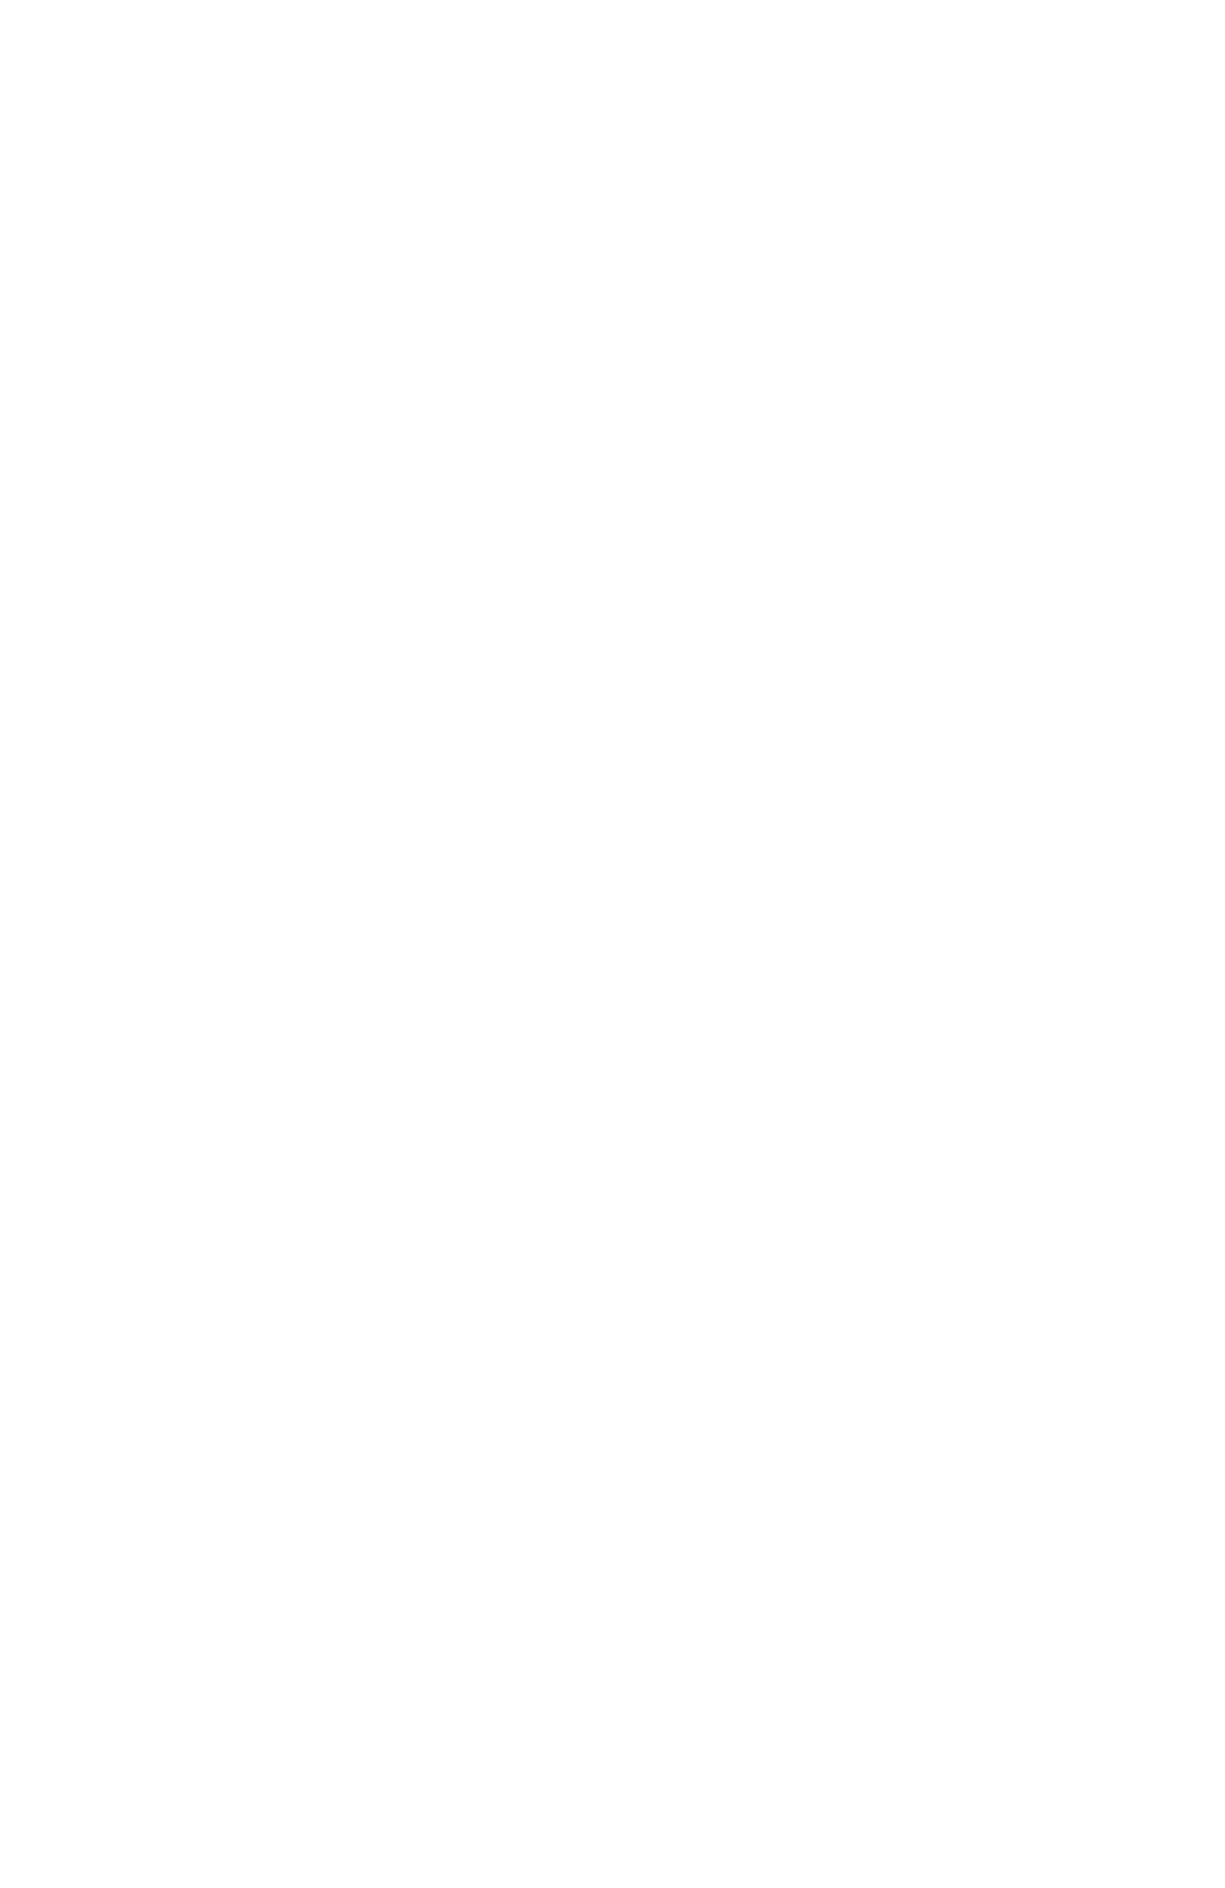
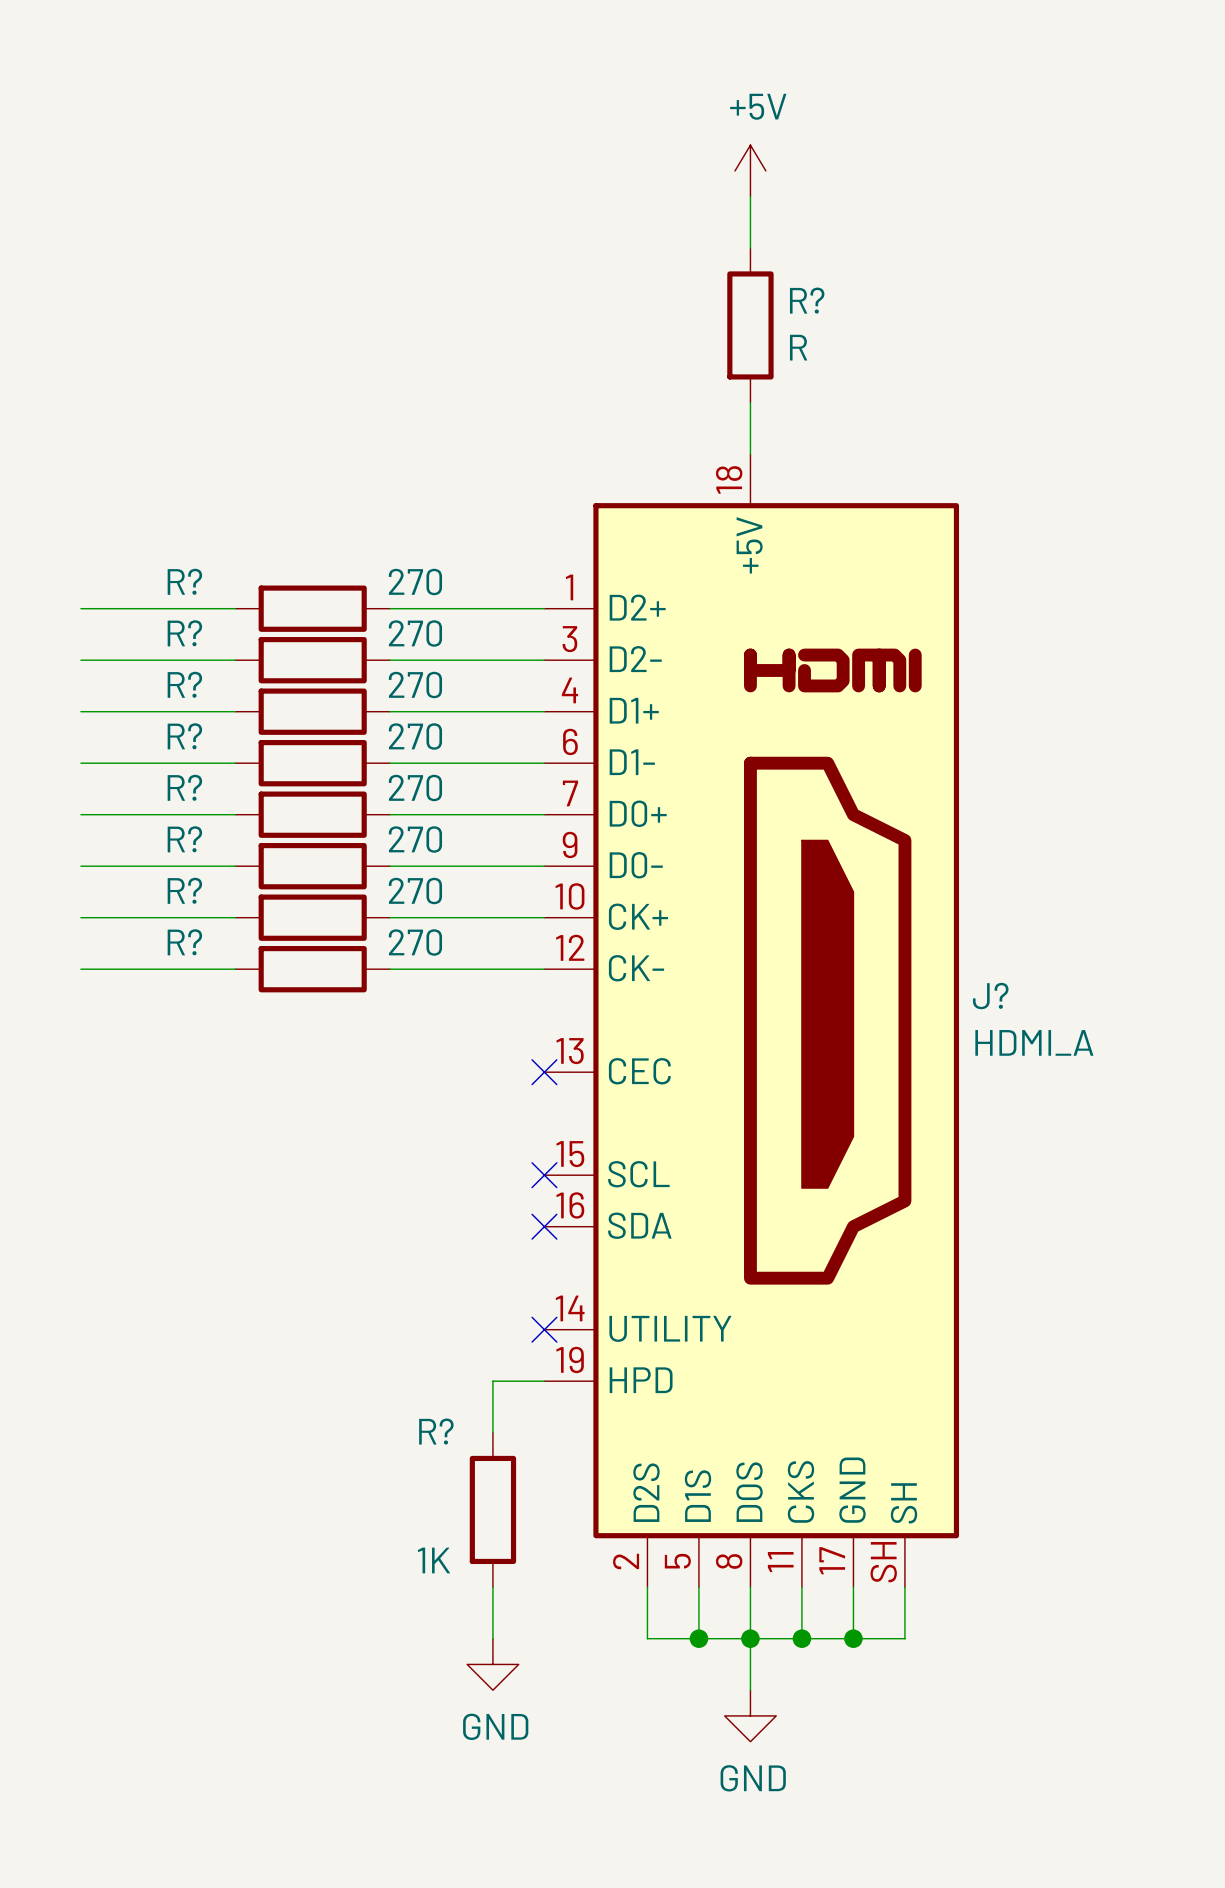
power symbol: none -> +5V (750, 170)
wire: none -> (750, 196) (750, 248)
R?: none -> R (750, 325)
wire: none -> (750, 402) (750, 454)
wire: none -> (80, 608) (235, 608)
R?: none -> 270 (312, 608)
wire: none -> (389, 608) (544, 608)
wire: none -> (80, 660) (235, 660)
R?: none -> 270 (312, 660)
wire: none -> (389, 660) (544, 660)
wire: none -> (80, 711) (235, 711)
R?: none -> 270 (312, 711)
wire: none -> (389, 711) (544, 711)
wire: none -> (80, 763) (235, 763)
R?: none -> 270 (312, 763)
wire: none -> (389, 763) (544, 763)
wire: none -> (80, 814) (235, 814)
R?: none -> 270 (312, 814)
wire: none -> (389, 814) (544, 814)
wire: none -> (80, 866) (235, 866)
R?: none -> 270 (312, 866)
wire: none -> (389, 866) (544, 866)
wire: none -> (80, 917) (235, 917)
R?: none -> 270 (312, 917)
wire: none -> (389, 917) (544, 917)
wire: none -> (80, 969) (235, 969)
R?: none -> 270 (312, 969)
wire: none -> (389, 969) (544, 969)
J?: none -> HDMI_A (751, 1020)
no-connect mark: none -> (544, 1072)
no-connect mark: none -> (544, 1175)
no-connect mark: none -> (544, 1226)
no-connect mark: none -> (544, 1329)
wire: none -> (544, 1381) (492, 1381) (492, 1432)
R?: none -> 1K (492, 1509)
wire: none -> (492, 1587) (492, 1638)
wire: none -> (647, 1587) (647, 1638) (904, 1638) (904, 1587)
wire: none -> (698, 1587) (698, 1638)
wire: none -> (750, 1587) (750, 1690)
wire: none -> (801, 1587) (801, 1638)
wire: none -> (853, 1587) (853, 1638)
junction: none -> (698, 1638)
junction: none -> (750, 1638)
junction: none -> (801, 1638)
junction: none -> (853, 1638)
power symbol: none -> GND (492, 1664)
power symbol: none -> GND (750, 1715)

